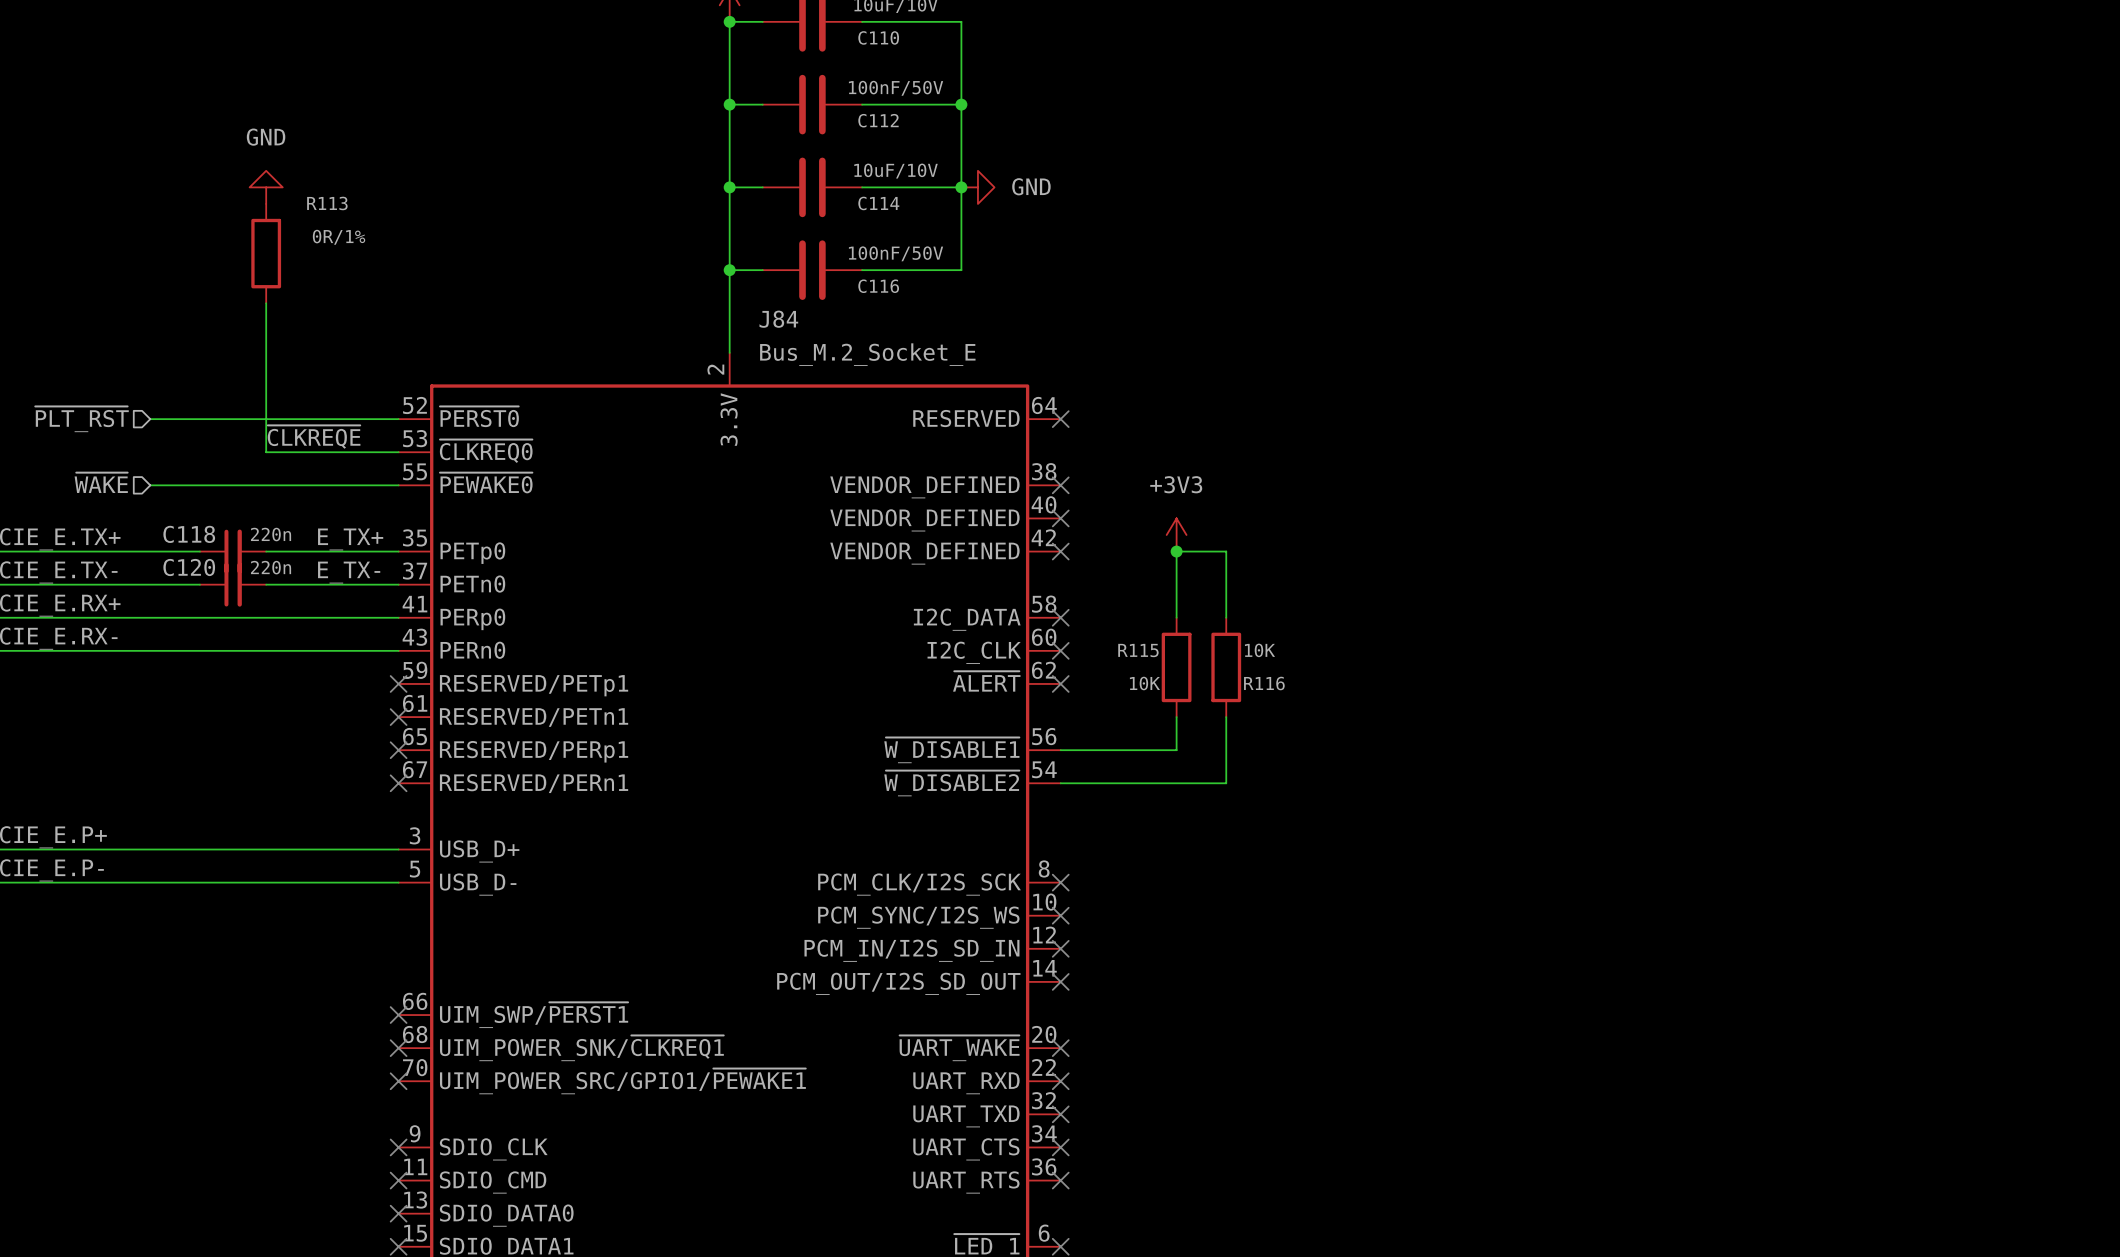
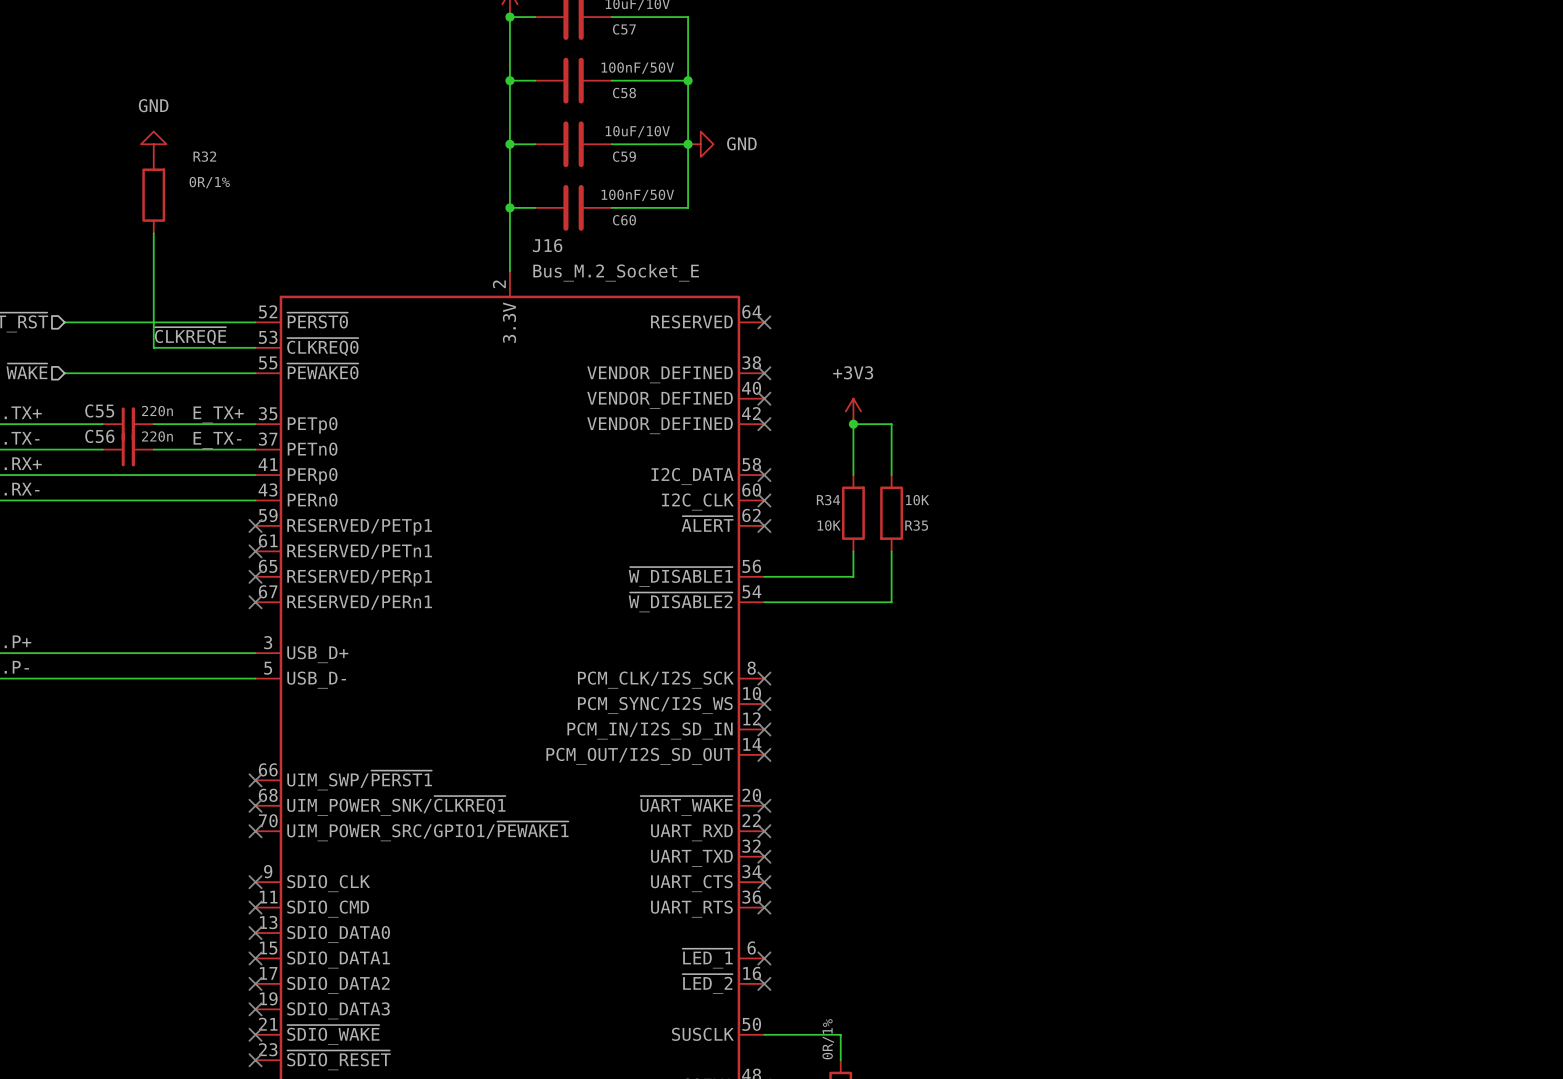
C110 name: C110 (878, 37) -> C57 (624, 29)
C112 name: C112 (878, 120) -> C58 (624, 93)
R113 name: R113 (327, 203) -> R32 (204, 156)
C114 name: C114 (878, 203) -> C59 (624, 156)
C116 name: C116 (878, 286) -> C60 (624, 220)
J84 name: J84 (778, 319) -> J16 (547, 245)
C118 name: C118 (189, 534) -> C55 (99, 410)
C120 name: C120 (189, 567) -> C56 (99, 436)
R115 name: R115 (1138, 650) -> R34 (828, 500)
R116 name: R116 (1264, 683) -> R35 (916, 525)

